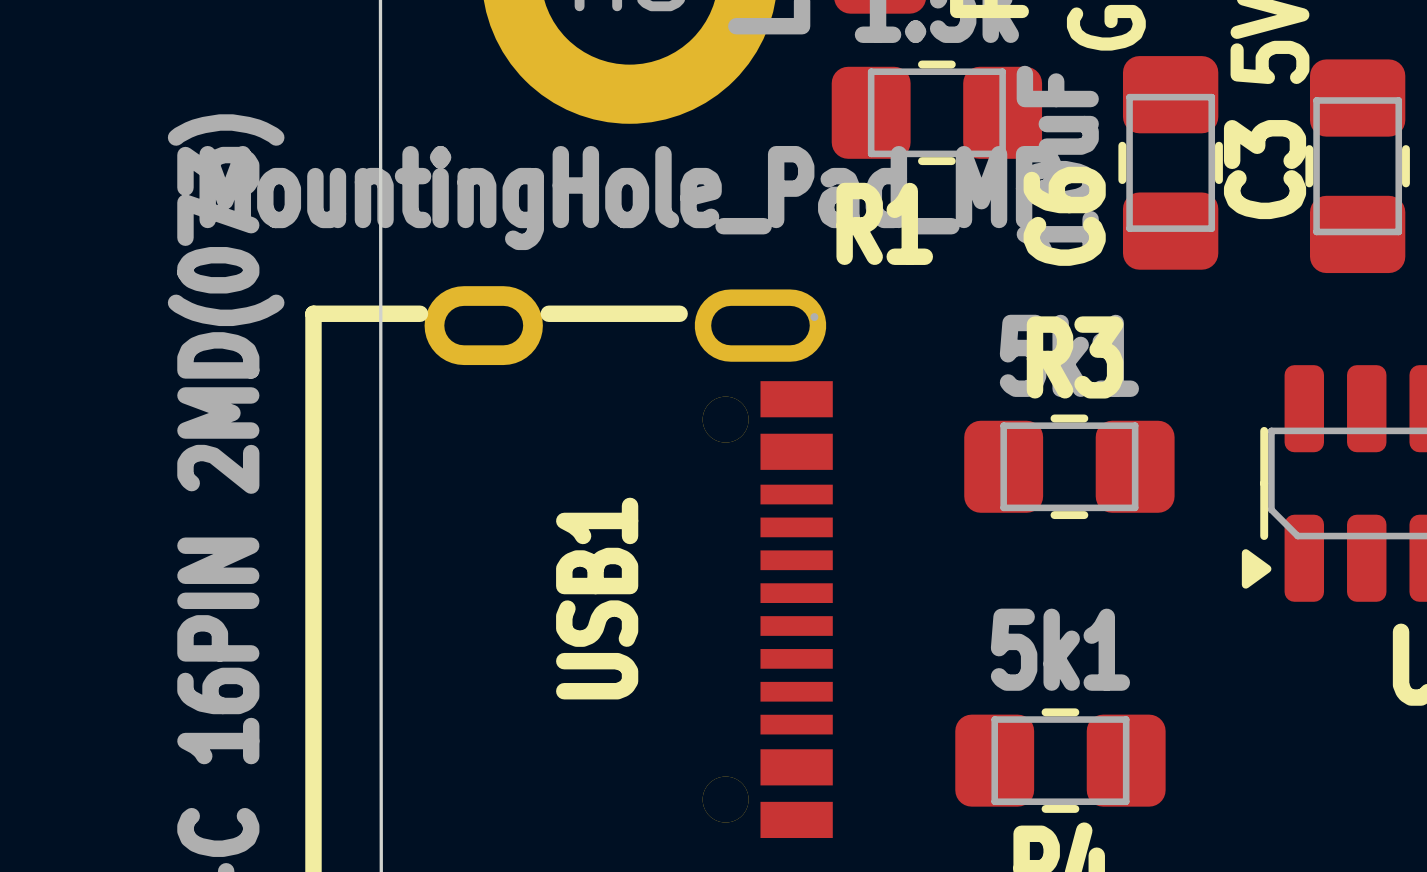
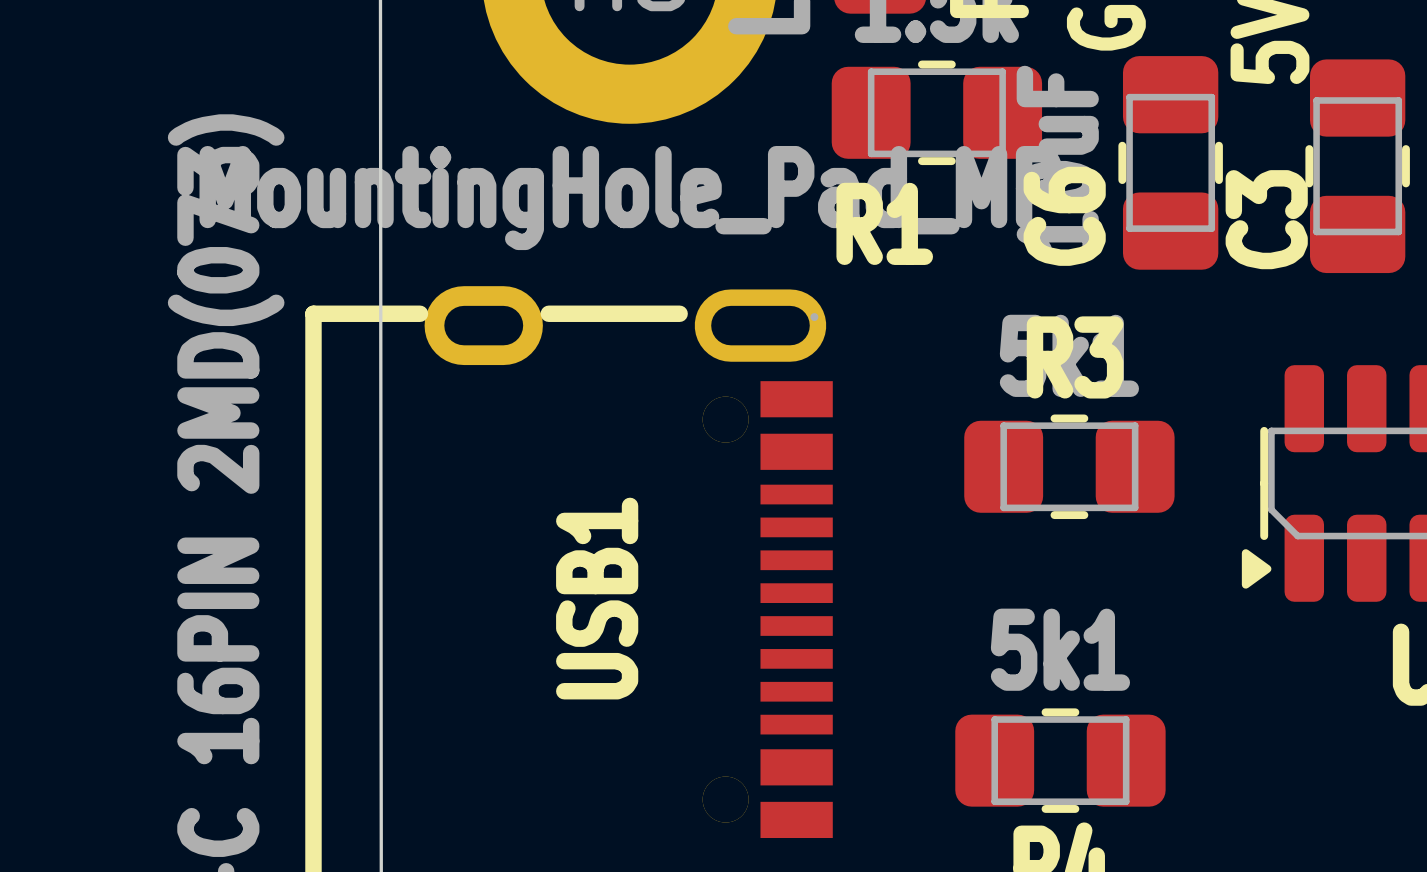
C3 name position: C3 (1265, 169) -> C3 (1266, 219)

